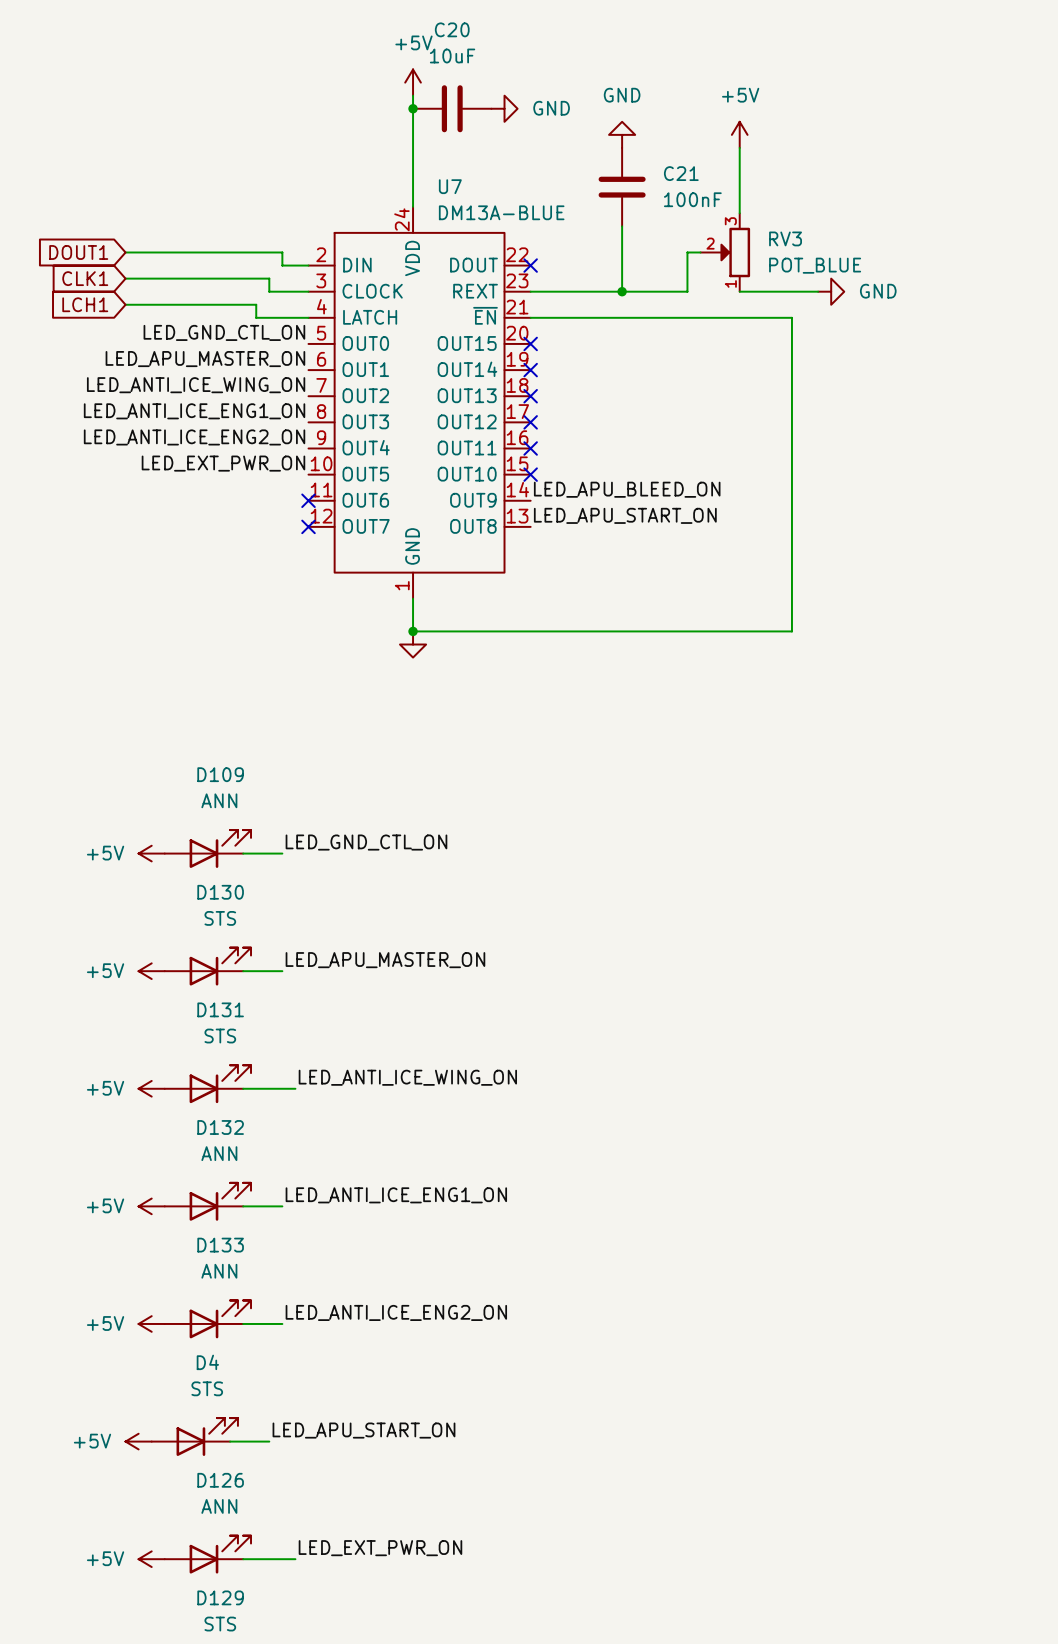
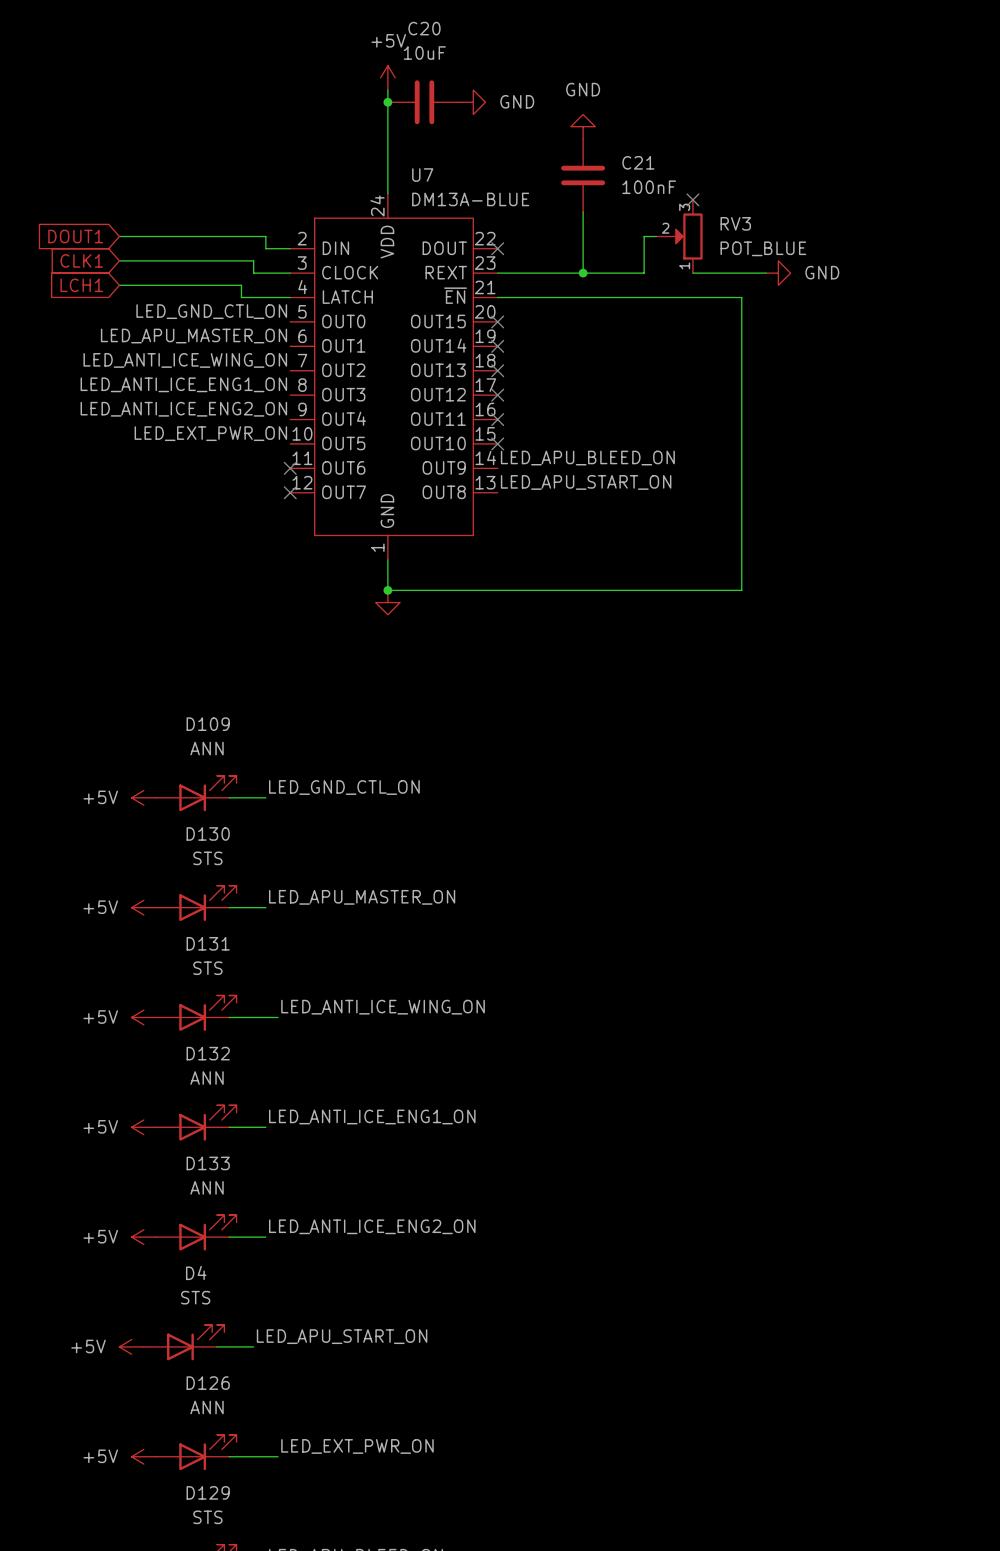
power symbol: +5V (739, 134) -> none
wire: (739, 147) (739, 213) -> none
no-connect mark: none -> (692, 199)

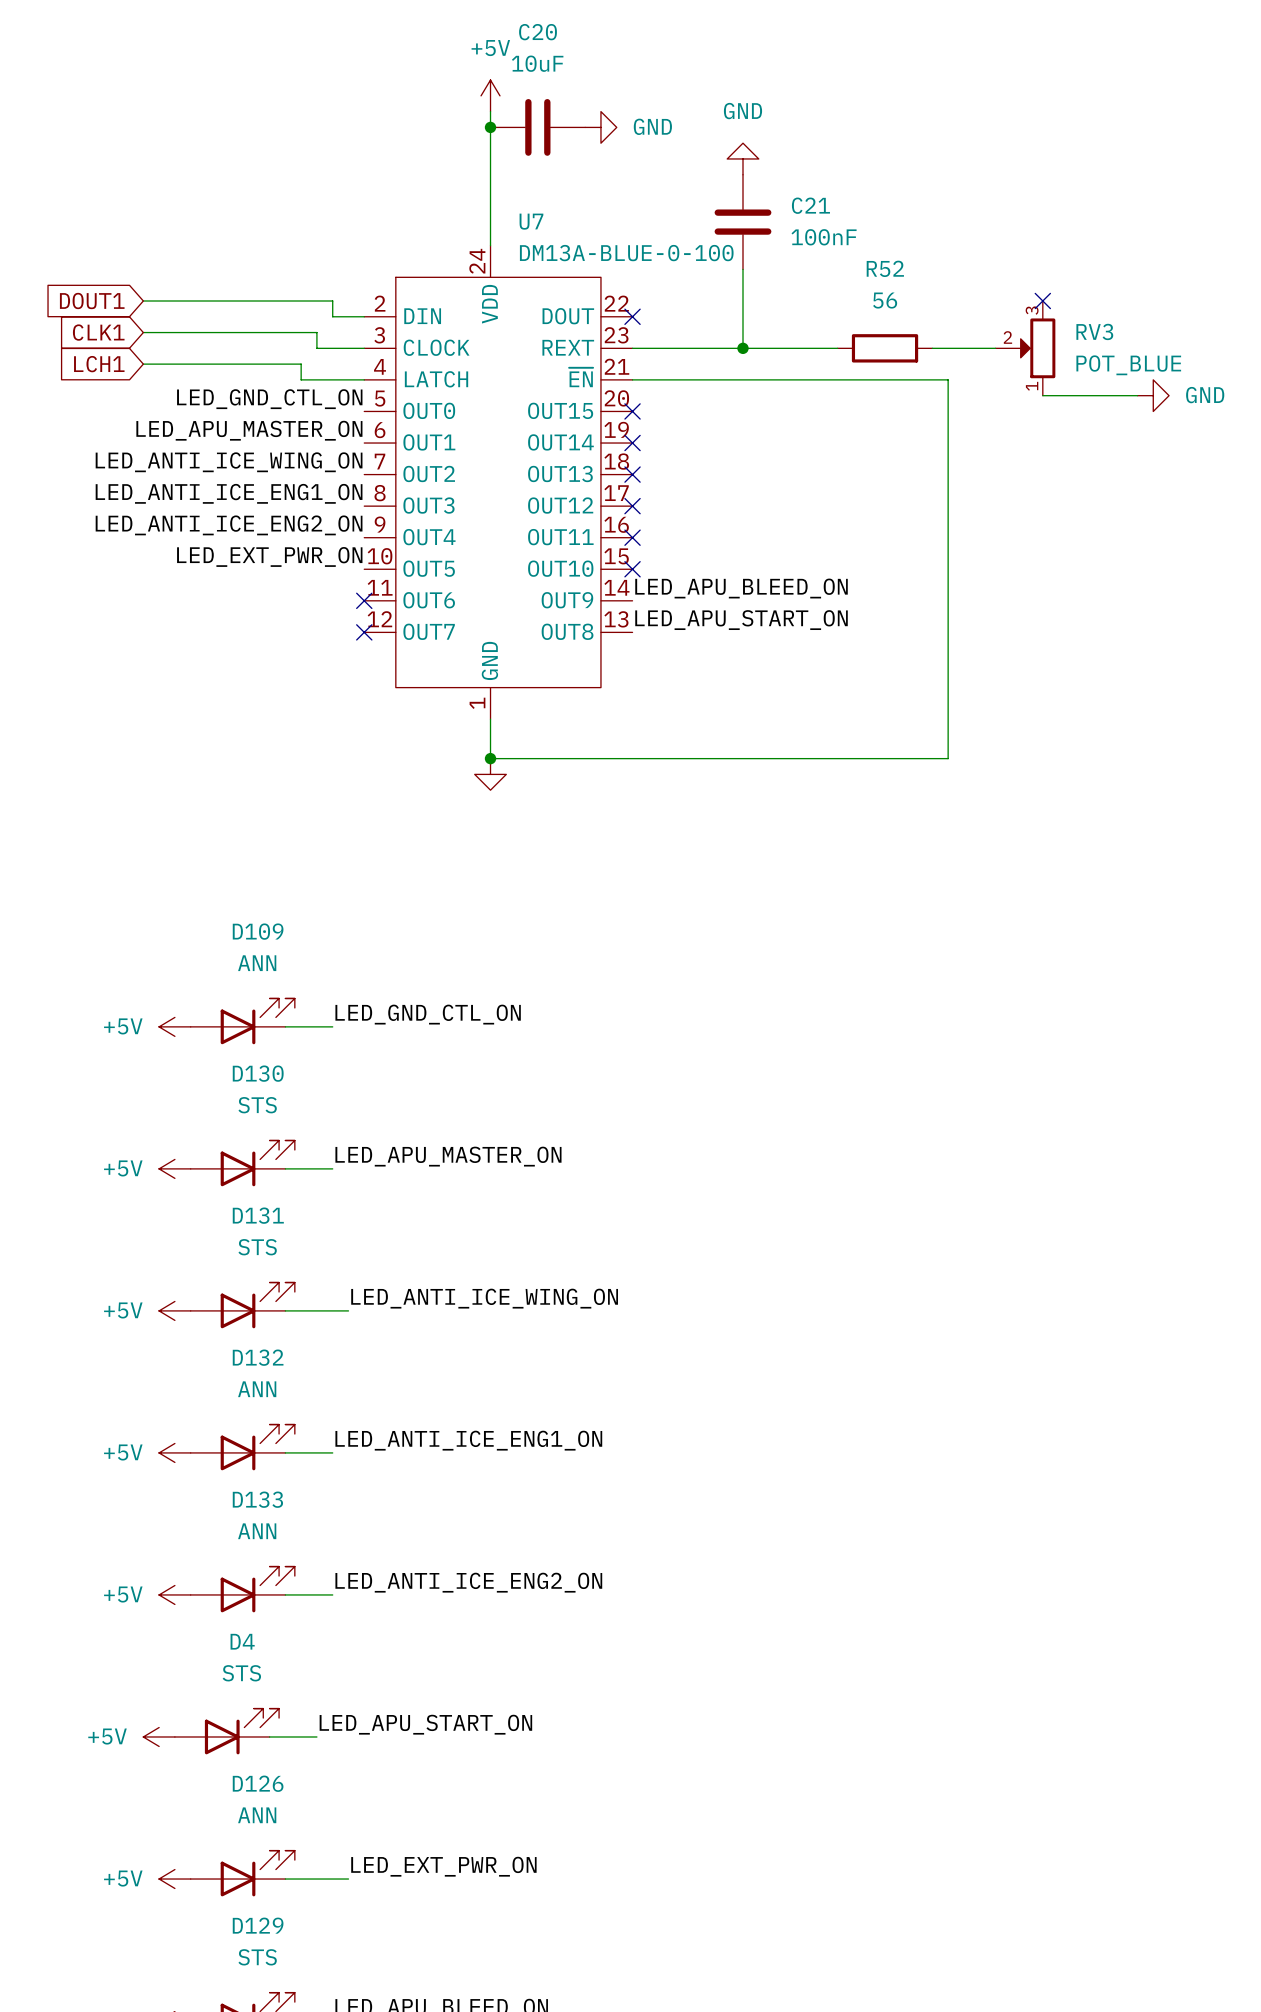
U7 value: DM13A-BLUE (470, 199) -> DM13A-BLUE-0-100 (626, 253)
no-connect mark: (692, 199) -> none
wire: (656, 236) (644, 236) (644, 273) -> (837, 348) (821, 348)
RV3 position: (679, 236) -> (1025, 348)
no-connect mark: none -> (1042, 300)
wire: (692, 273) (729, 273) -> none
R52: none -> 56 (885, 348)
power symbol position: GND (778, 273) -> GND (1153, 395)
wire: none -> (1042, 395) (1137, 395)

